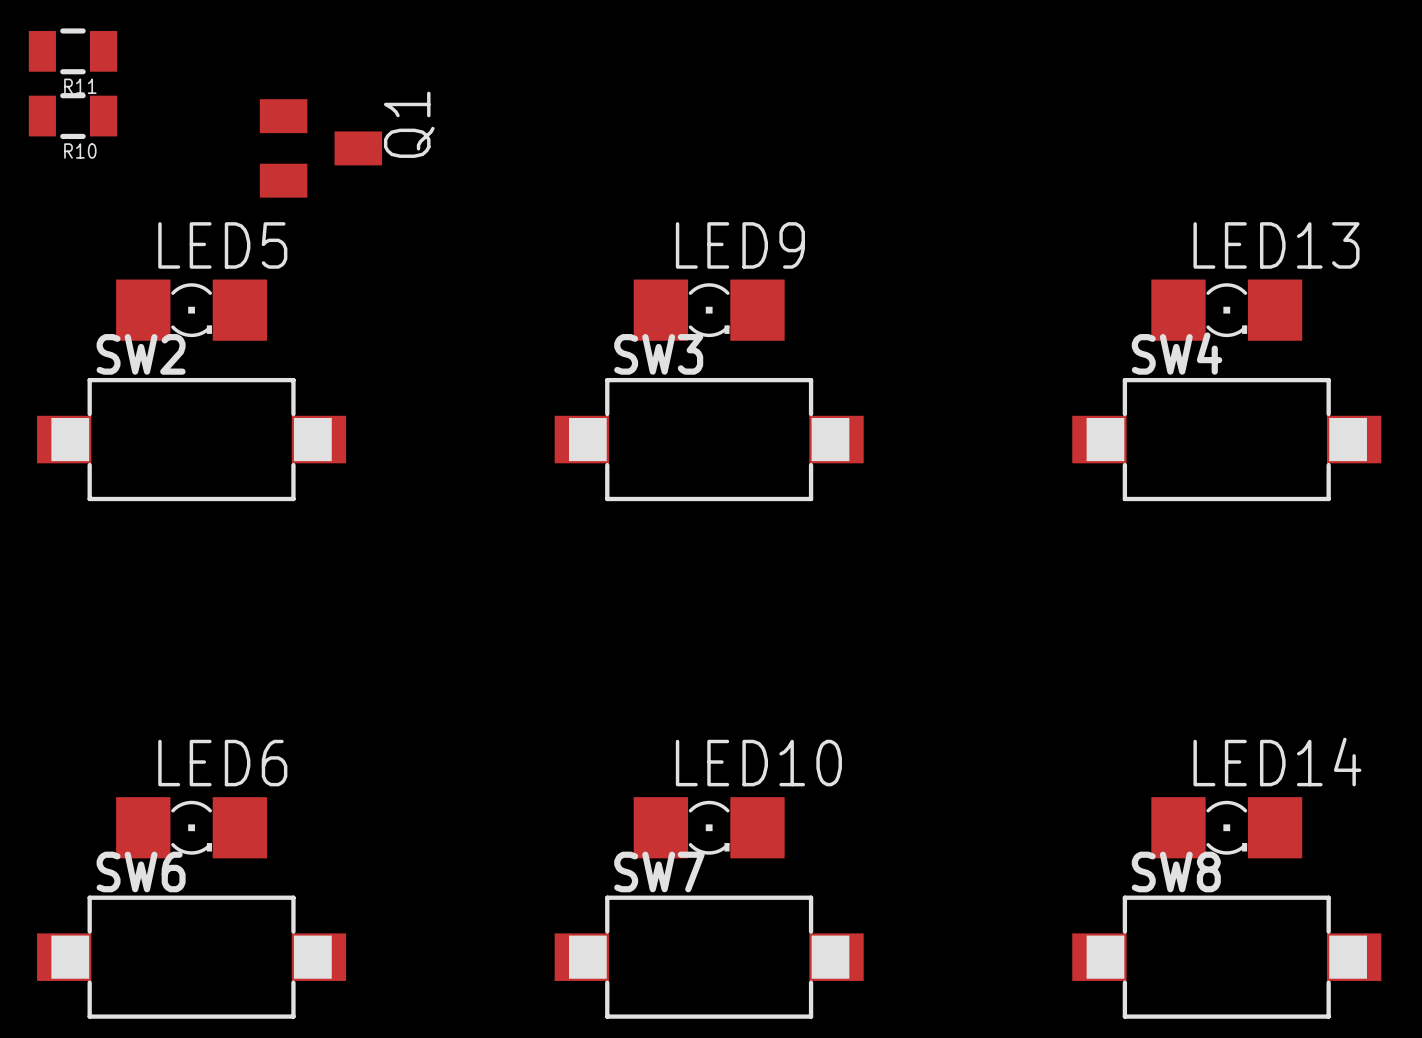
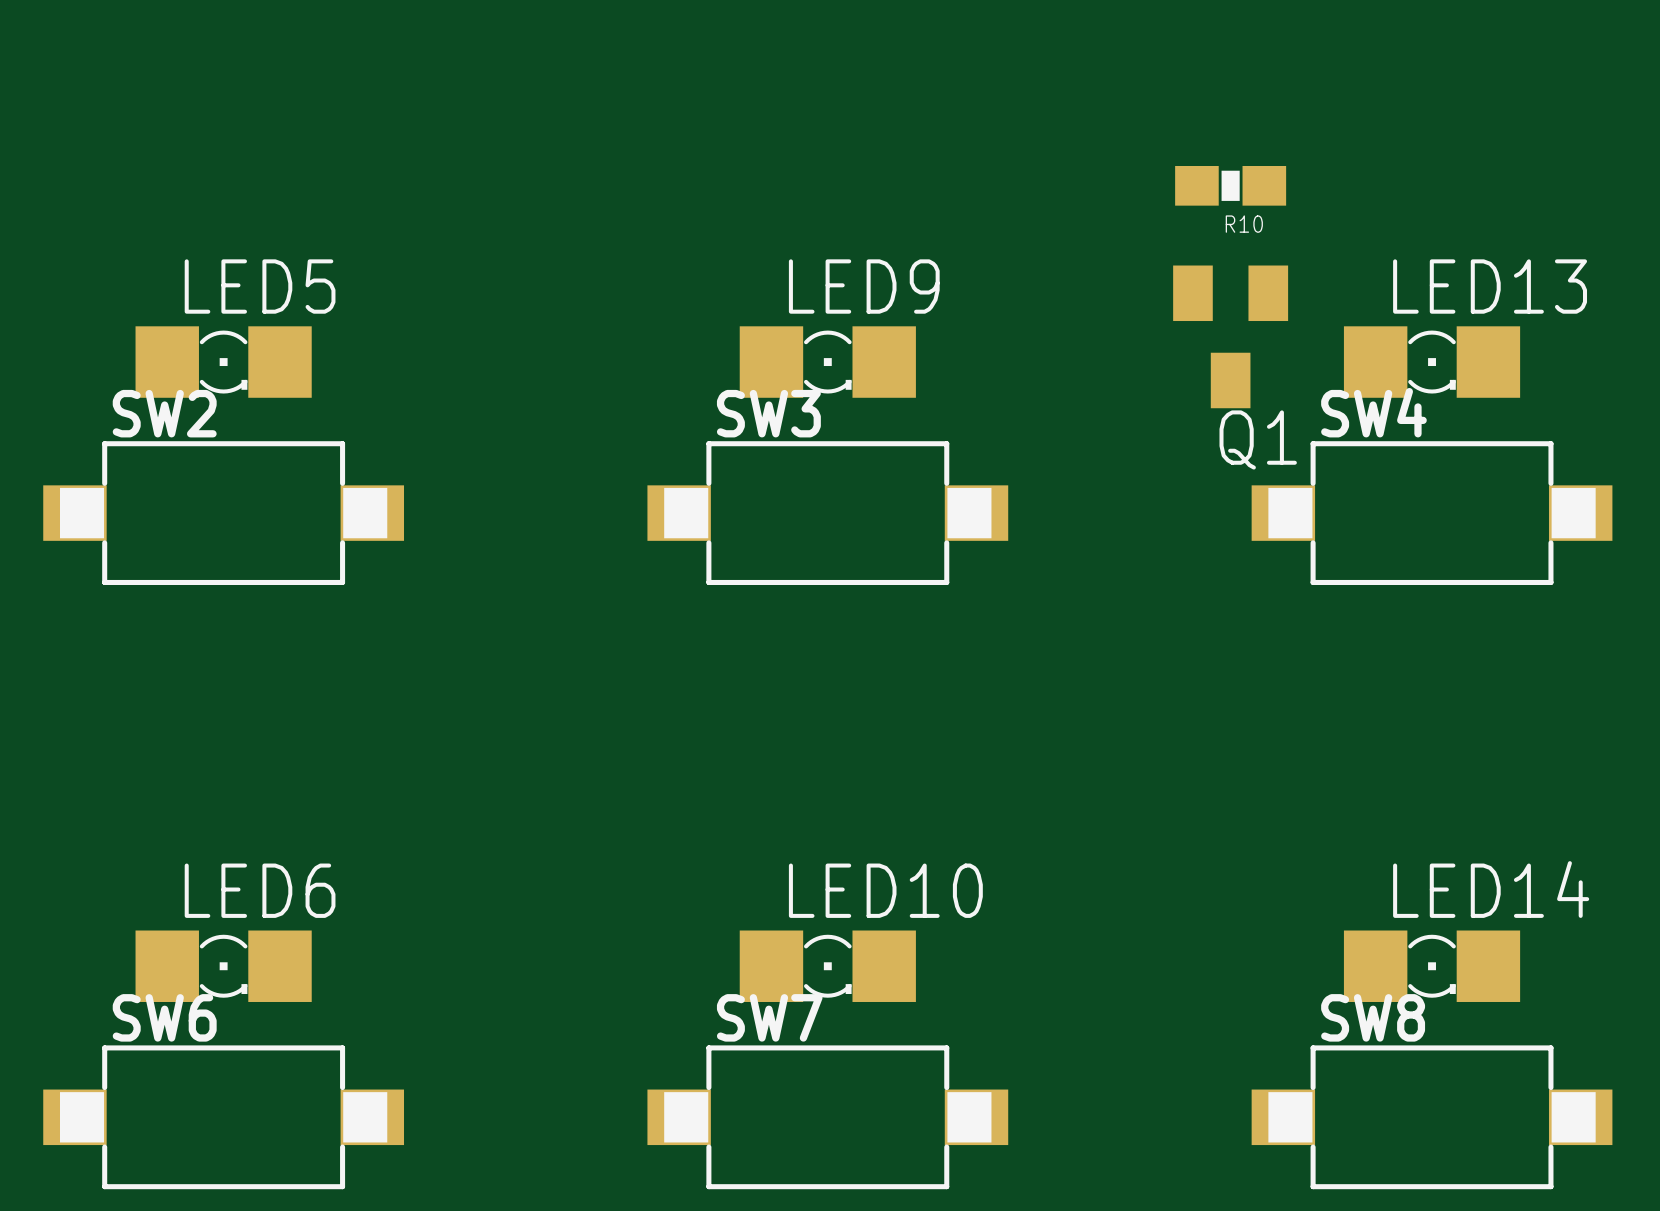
R11: (72, 51) -> none
R10 footprint: [28, 93, 118, 140] -> [1175, 166, 1287, 206]
Q1 rotation: 0° (320, 148) -> 90° clockwise (1230, 336)
Q1 position: (320, 148) -> (1230, 336)

